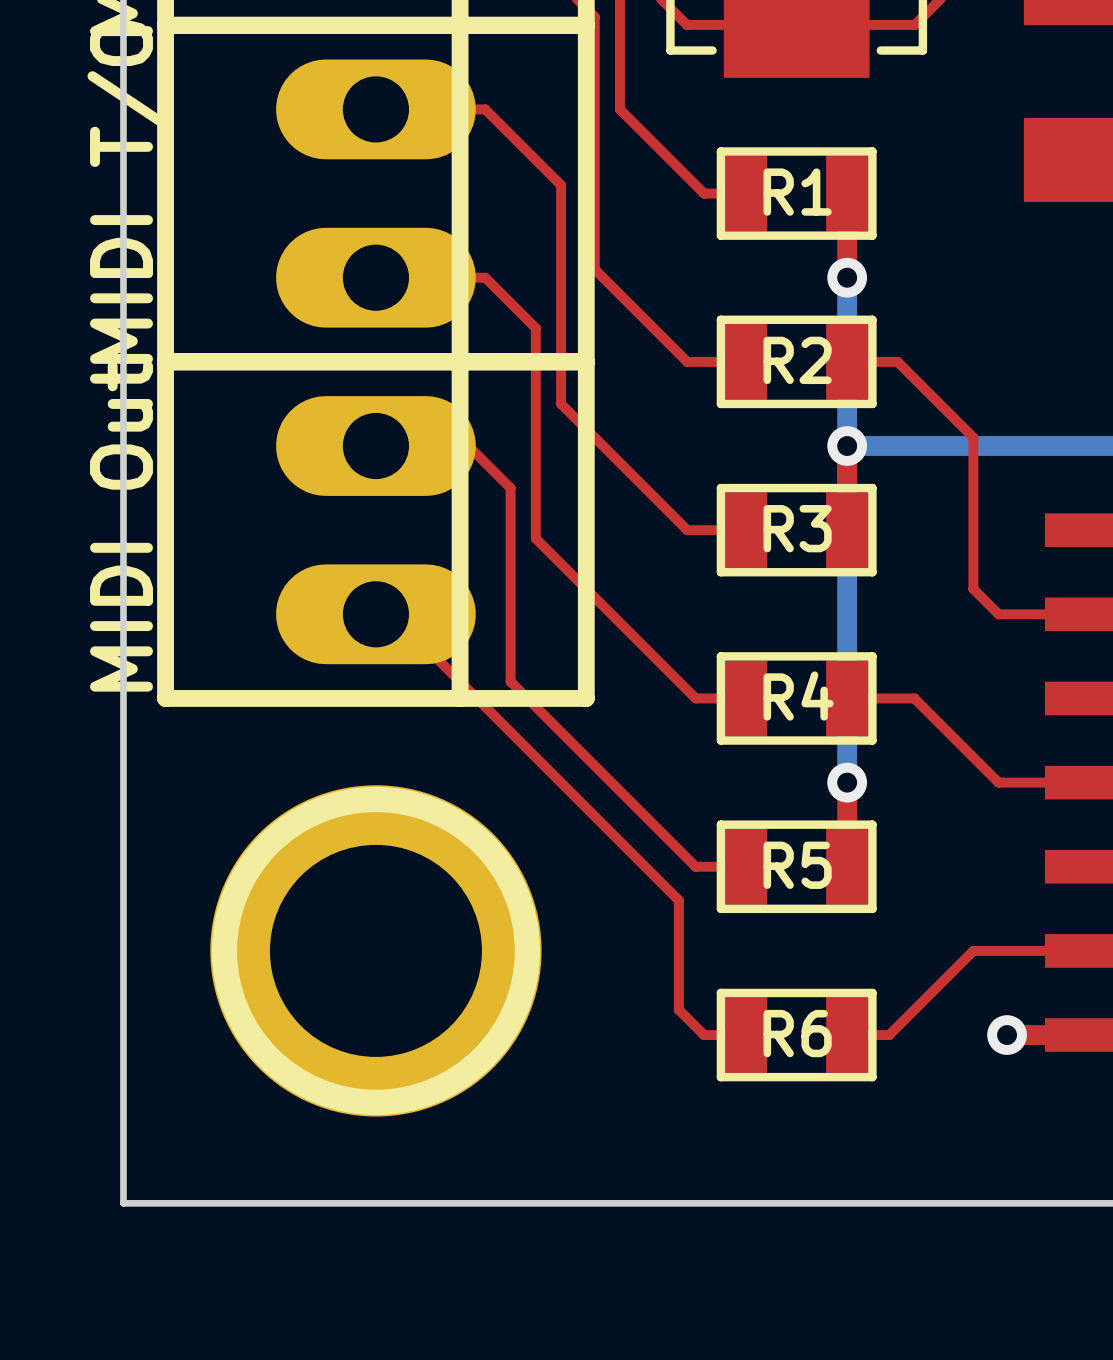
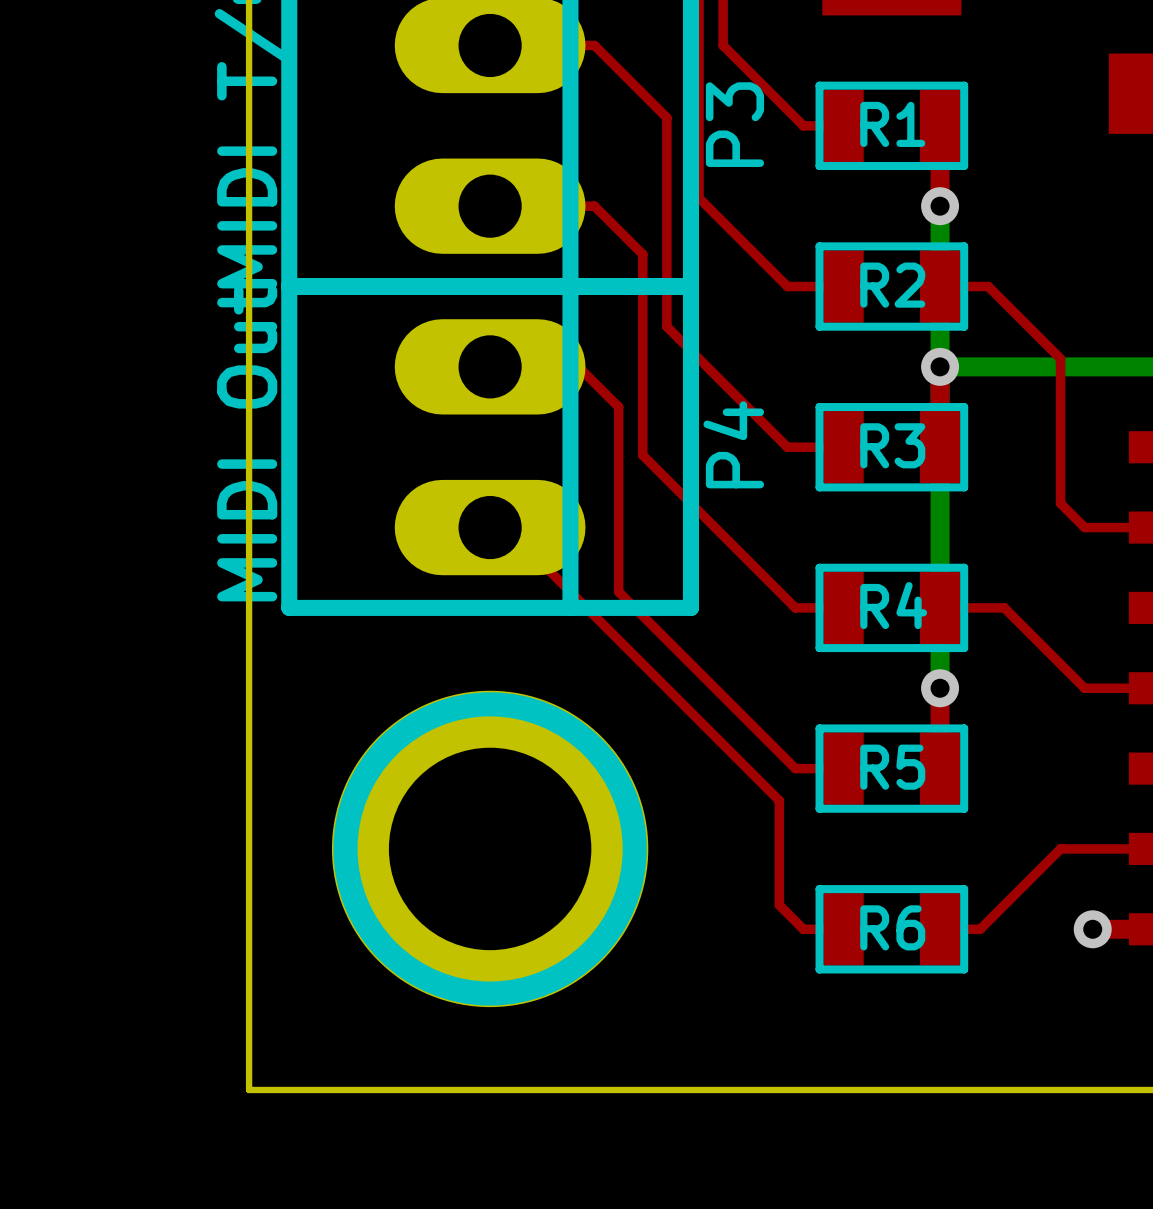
P3 name: none -> P3 (734, 124)
P4 name: none -> P4 (733, 444)

